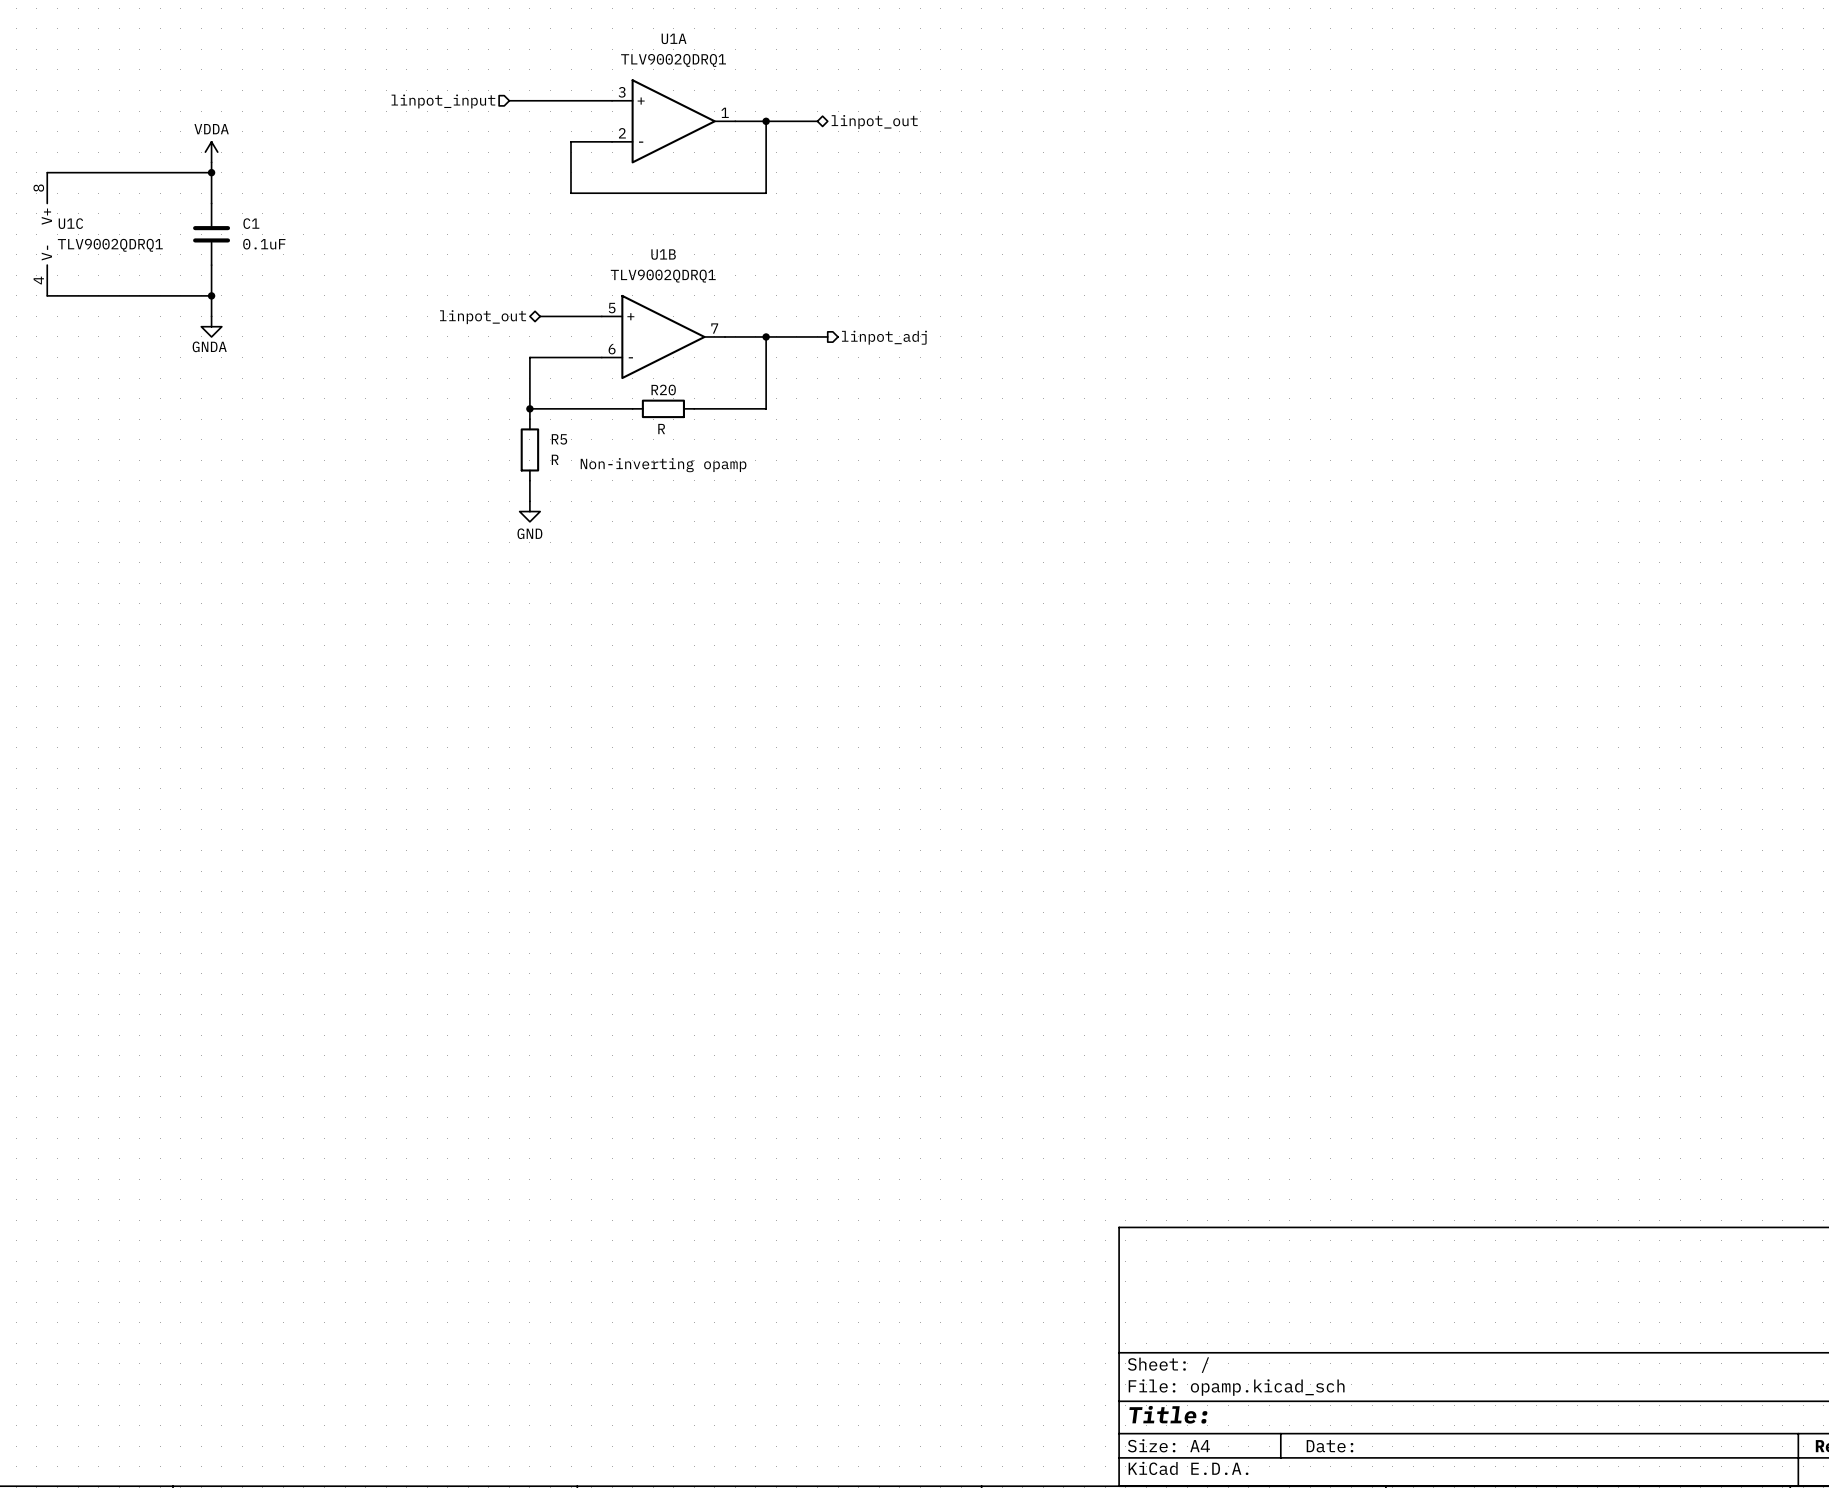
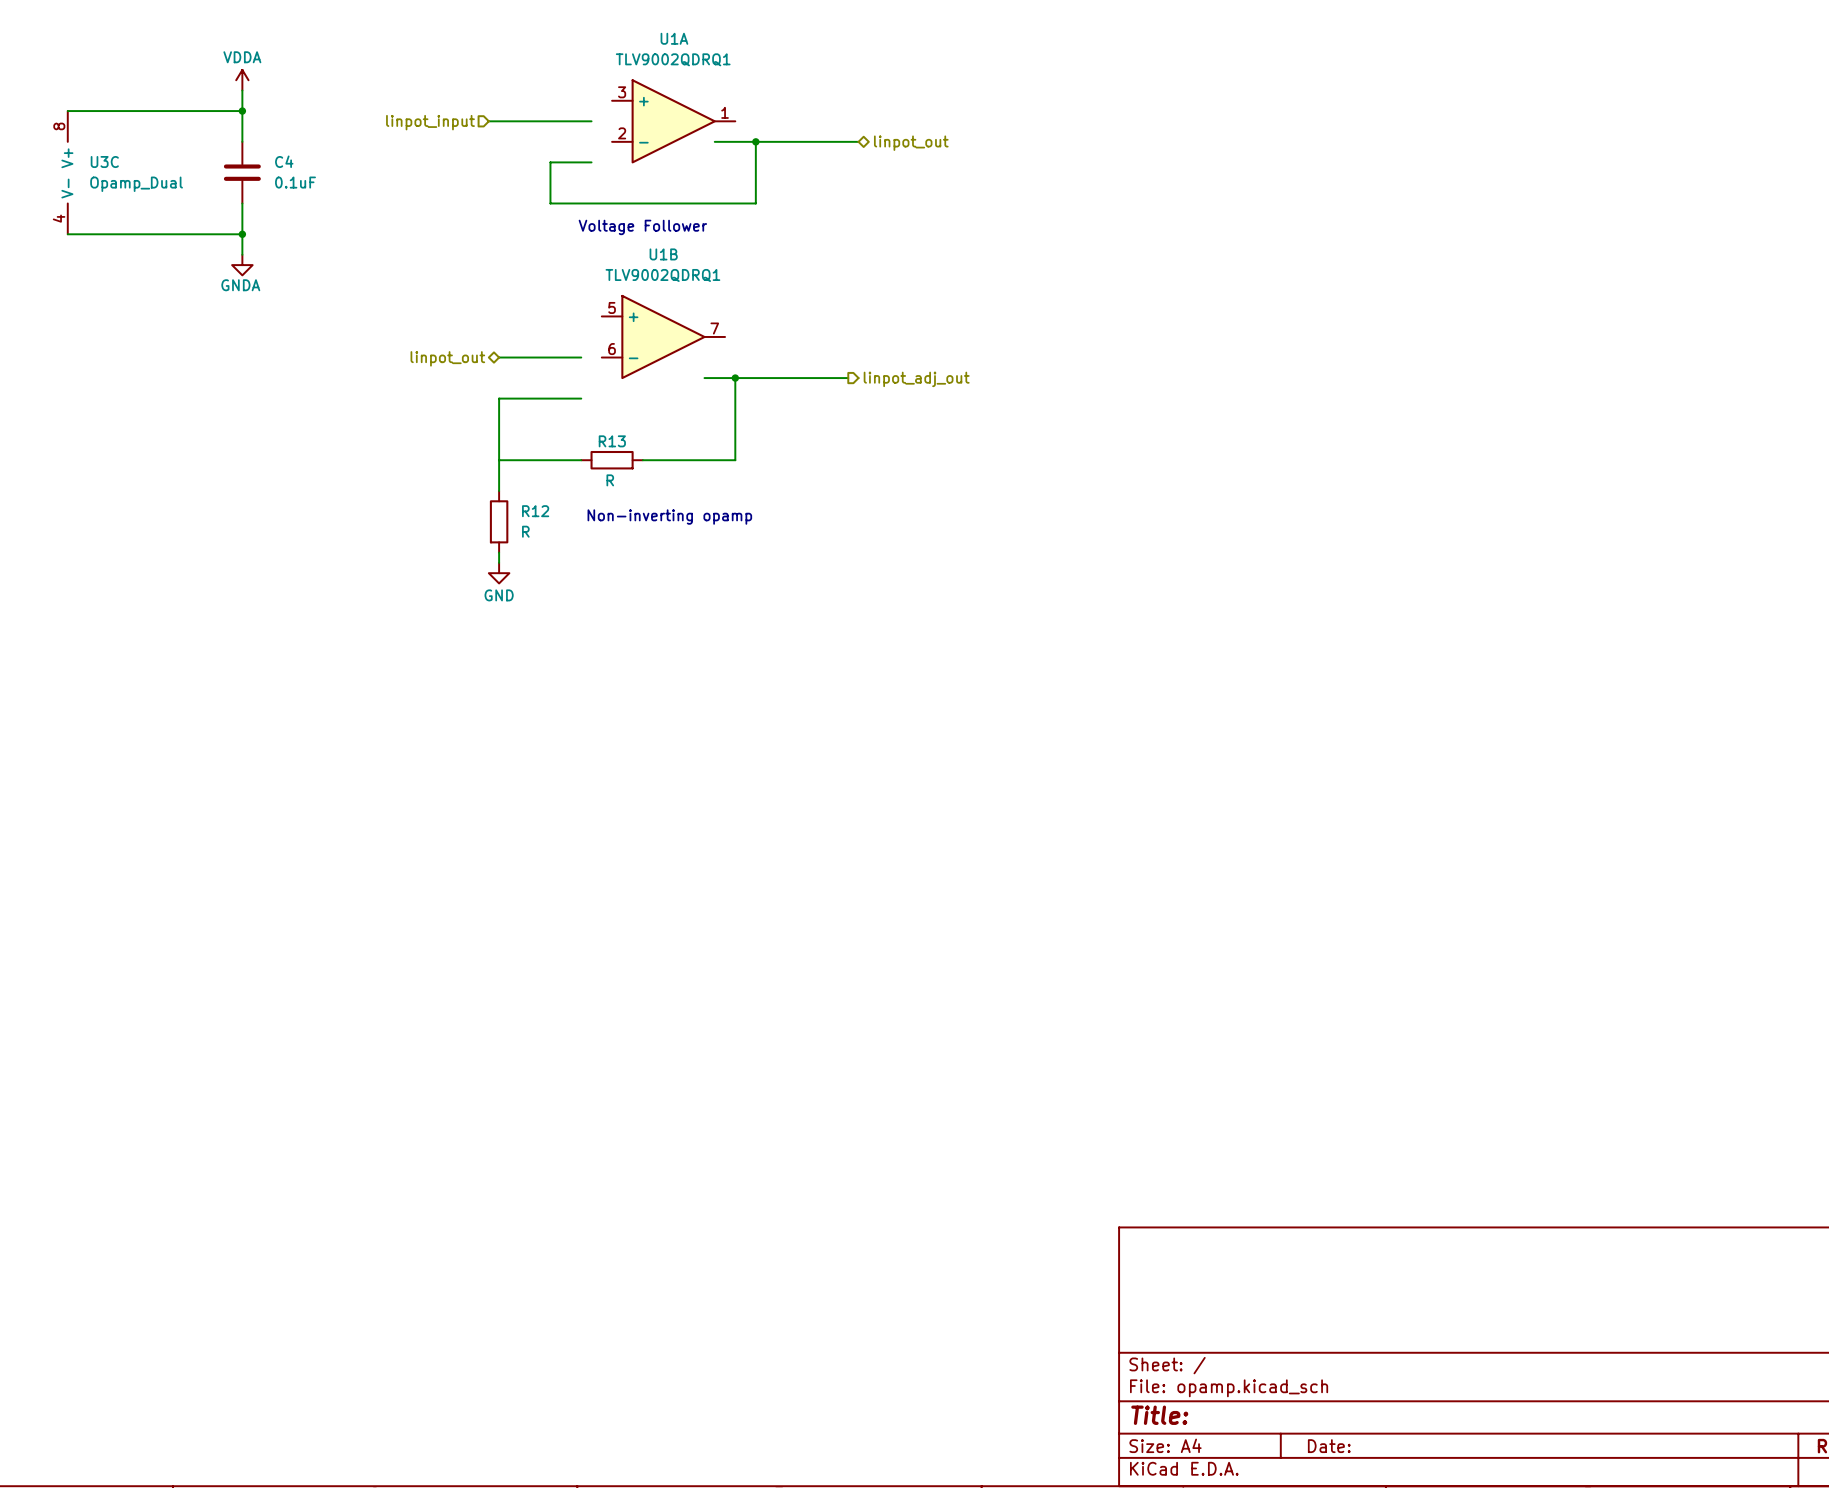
wire: none -> (242, 90) (242, 141)
wire: (509, 100) (612, 100) -> (488, 121) (591, 121)
hierarchical label position: linpot_input (443, 101) -> linpot_input (430, 122)
wire: none -> (67, 111) (242, 111)
junction: none -> (242, 111)
wire: (735, 121) (817, 121) -> none
wire: (766, 121) (766, 193) (571, 193) (571, 141) (612, 141) -> none
junction position: (766, 121) -> (755, 141)
hierarchical label position: linpot_out (874, 122) -> linpot_out (911, 143)
wire: none -> (714, 141) (858, 141)
wire: none -> (755, 141) (755, 203) (550, 203) (550, 162) (591, 162)
power symbol position: VDDA (211, 152) -> VDDA (242, 80)
wire: (211, 162) (211, 203) -> none
wire: (47, 172) (211, 172) -> none
U3C: none -> Opamp_Dual (67, 172)
junction: (211, 172) -> none
C4: none -> 0.1uF (242, 172)
text: none -> Voltage Follower (642, 227)
U1C: TLV9002QDRQ1 (47, 234) -> none
wire: none -> (67, 234) (242, 234)
C1: 0.1uF (211, 234) -> none
junction: none -> (242, 234)
wire: (211, 265) (211, 316) -> (242, 203) (242, 254)
wire: (47, 295) (211, 295) -> none
junction: (211, 295) -> none
wire: (540, 316) (601, 316) -> none
hierarchical label position: linpot_out (483, 317) -> linpot_out (447, 358)
power symbol position: GNDA (211, 326) -> GNDA (242, 265)
wire: (725, 336) (827, 336) -> none
wire: (766, 336) (766, 408) (694, 408) -> none
junction: (766, 336) -> none
hierarchical label: linpot_adj (884, 337) -> none
wire: (529, 357) (529, 419) -> (529, 357) (499, 357)
wire: (581, 357) (601, 357) -> none
wire: none -> (704, 378) (848, 378)
wire: none -> (735, 378) (735, 460) (642, 460)
junction: none -> (735, 378)
hierarchical label: none -> linpot_adj_out (916, 379)
wire: none -> (581, 398) (499, 398) (499, 491)
wire: (529, 408) (632, 408) -> none
junction: (529, 408) -> none
R20: R (663, 408) -> none
R5: R (529, 449) -> none
wire: none -> (499, 460) (581, 460)
R13: none -> R (612, 460)
text position: Non-inverting opamp (663, 465) -> Non-inverting opamp (669, 517)
wire: (529, 480) (529, 501) -> none
power symbol position: GND (529, 511) -> GND (499, 573)
R12: none -> R (499, 521)
wire: none -> (499, 552) (499, 562)

